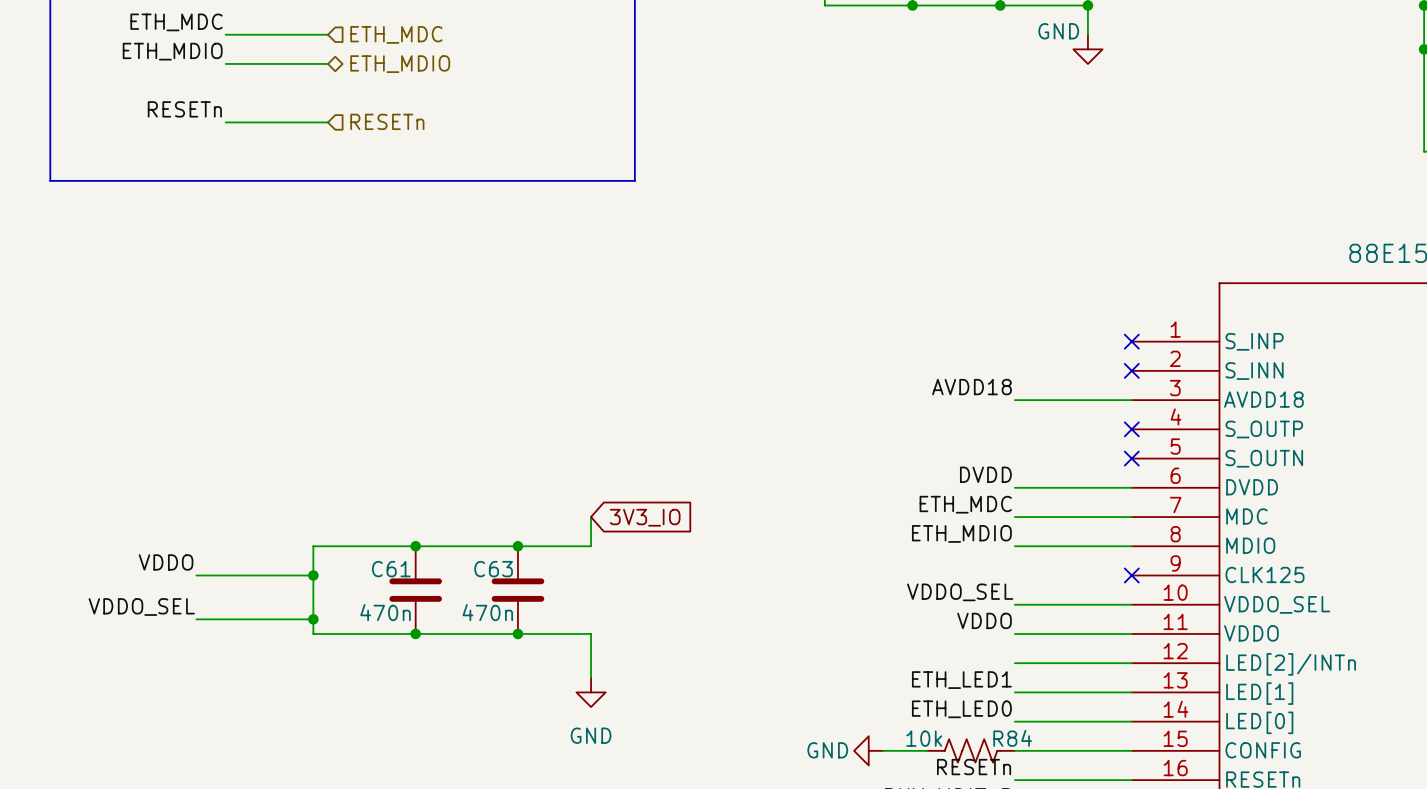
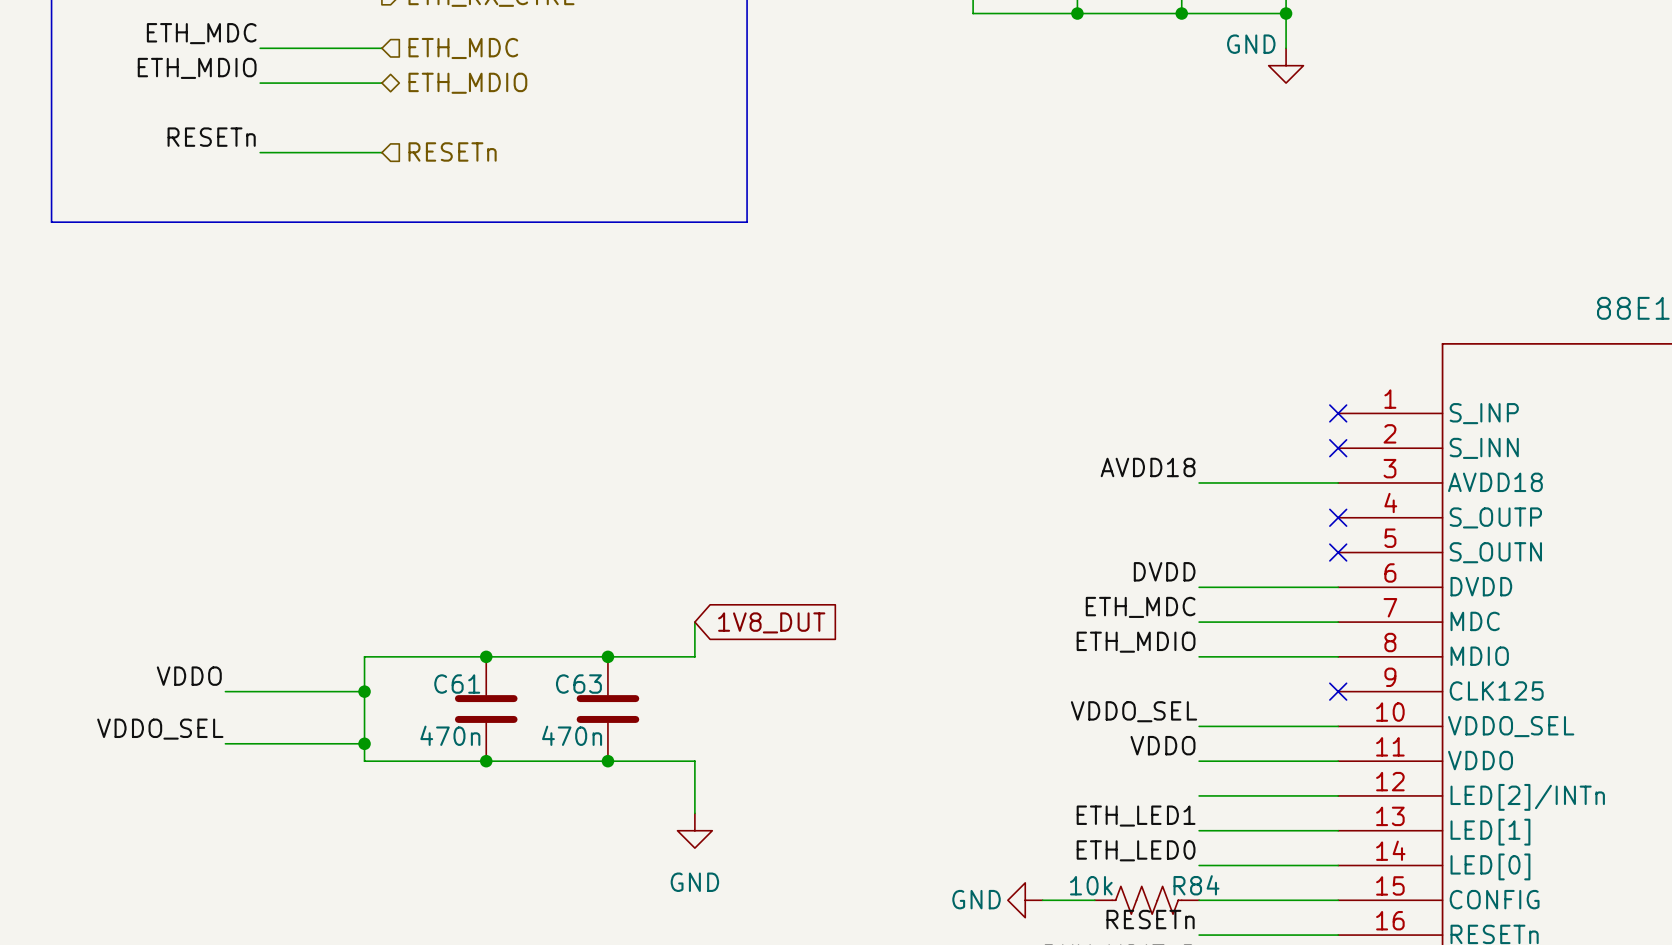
global label: 3V3_IO (645, 517) -> 1V8_DUT (771, 622)

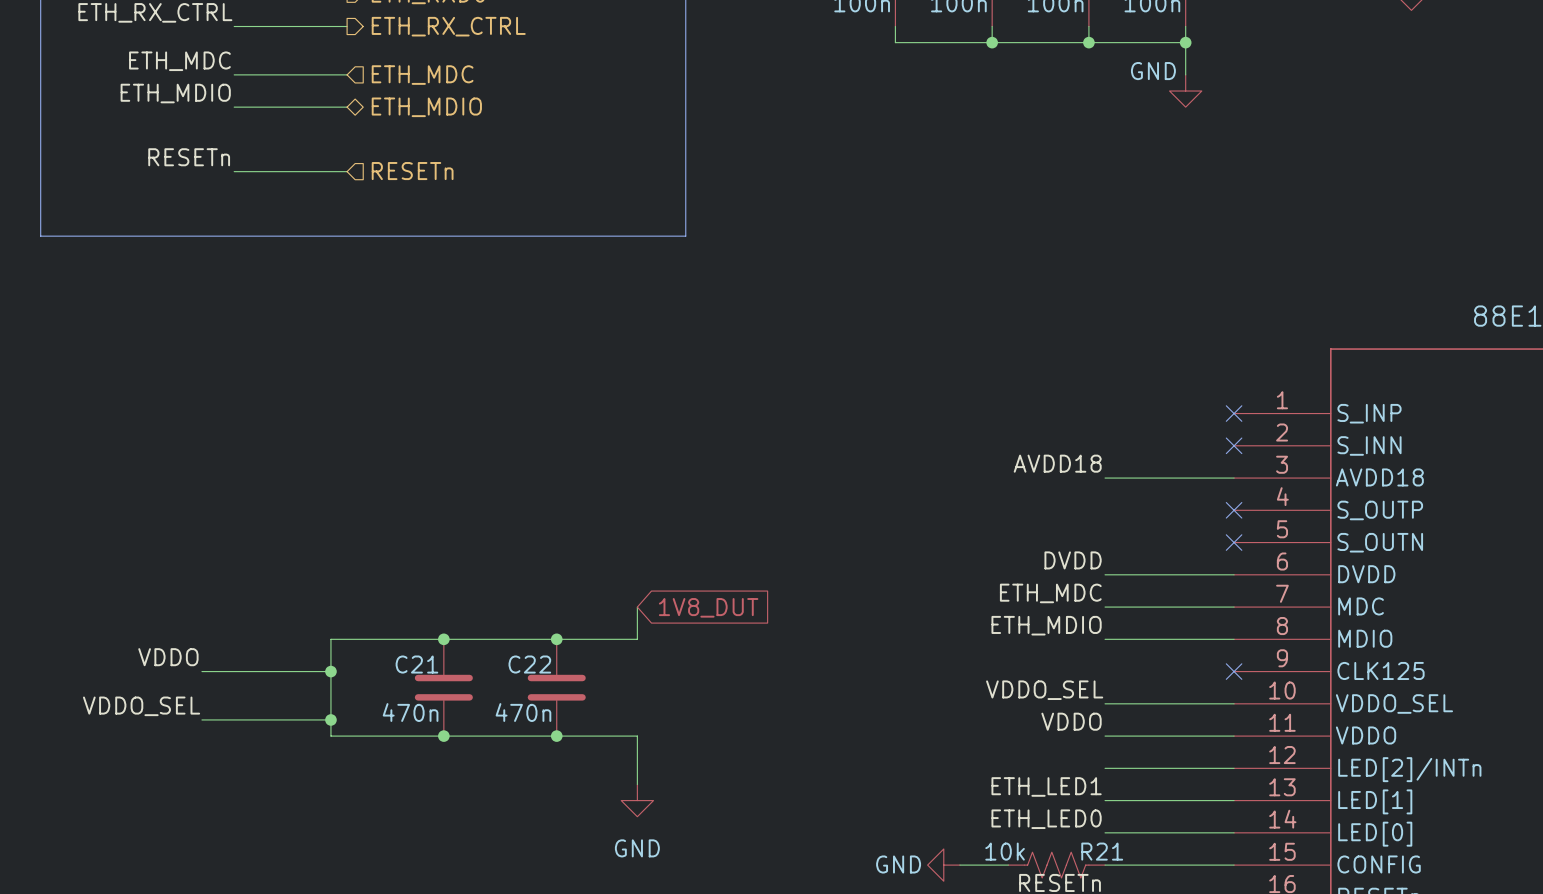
C61 name: C61 (457, 684) -> C21 (416, 664)
C63 name: C63 (578, 684) -> C22 (529, 664)
R84 name: R84 (1196, 885) -> R21 (1102, 851)

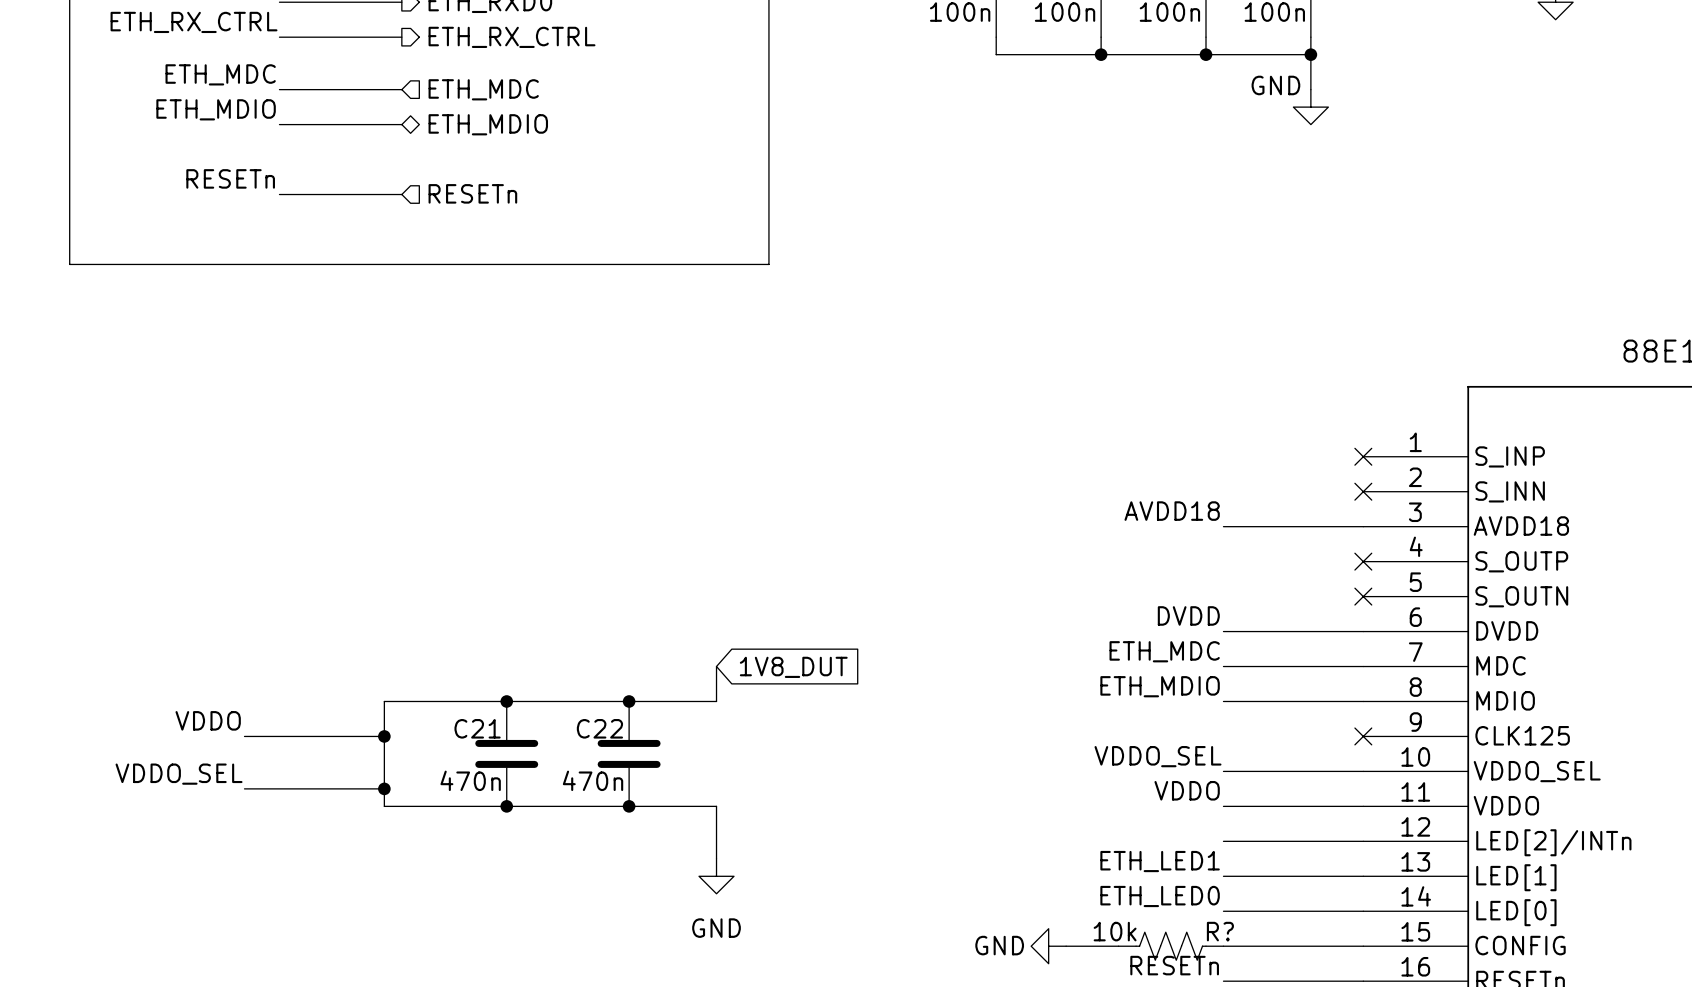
R21 name: R21 (1102, 851) -> R? (1220, 931)

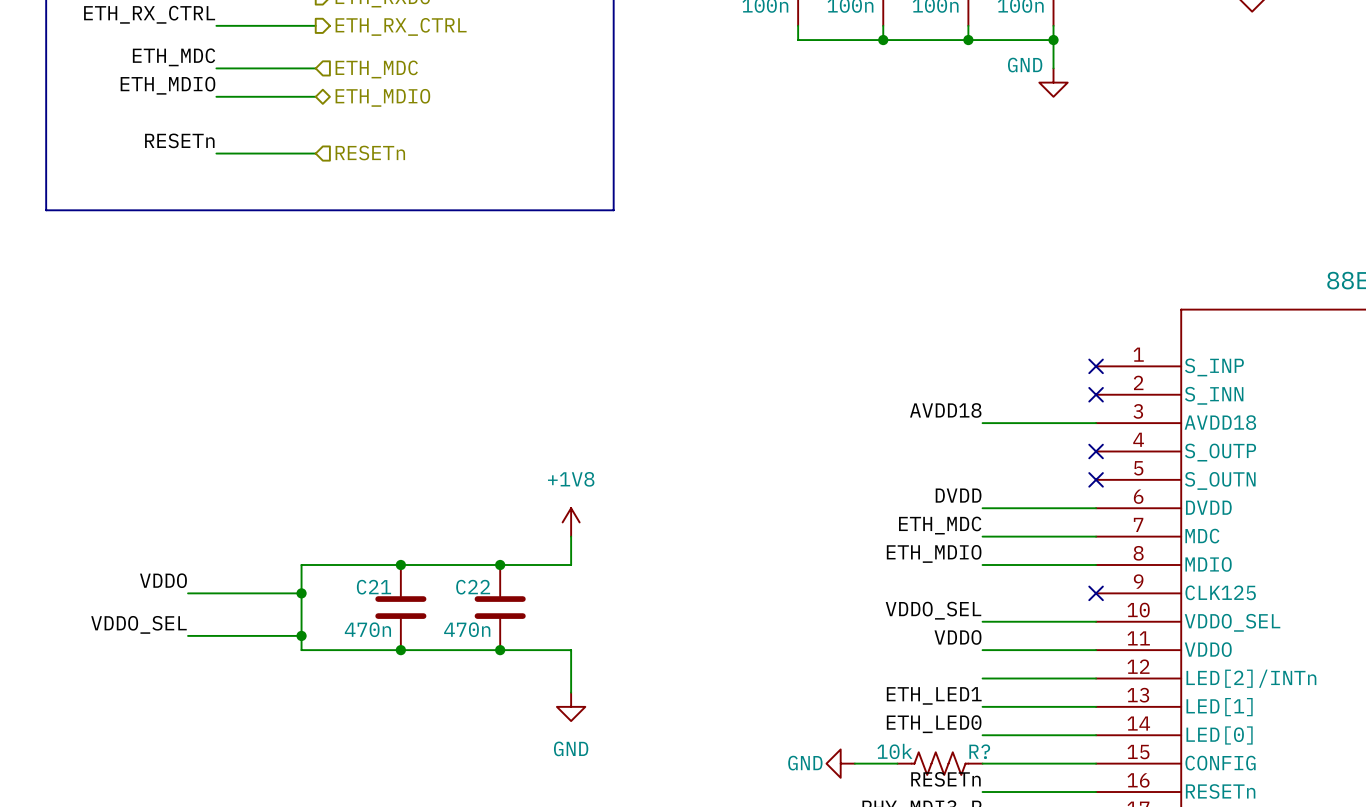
power symbol: none -> +1V8 (571, 522)
global label: 1V8_DUT (793, 667) -> none

